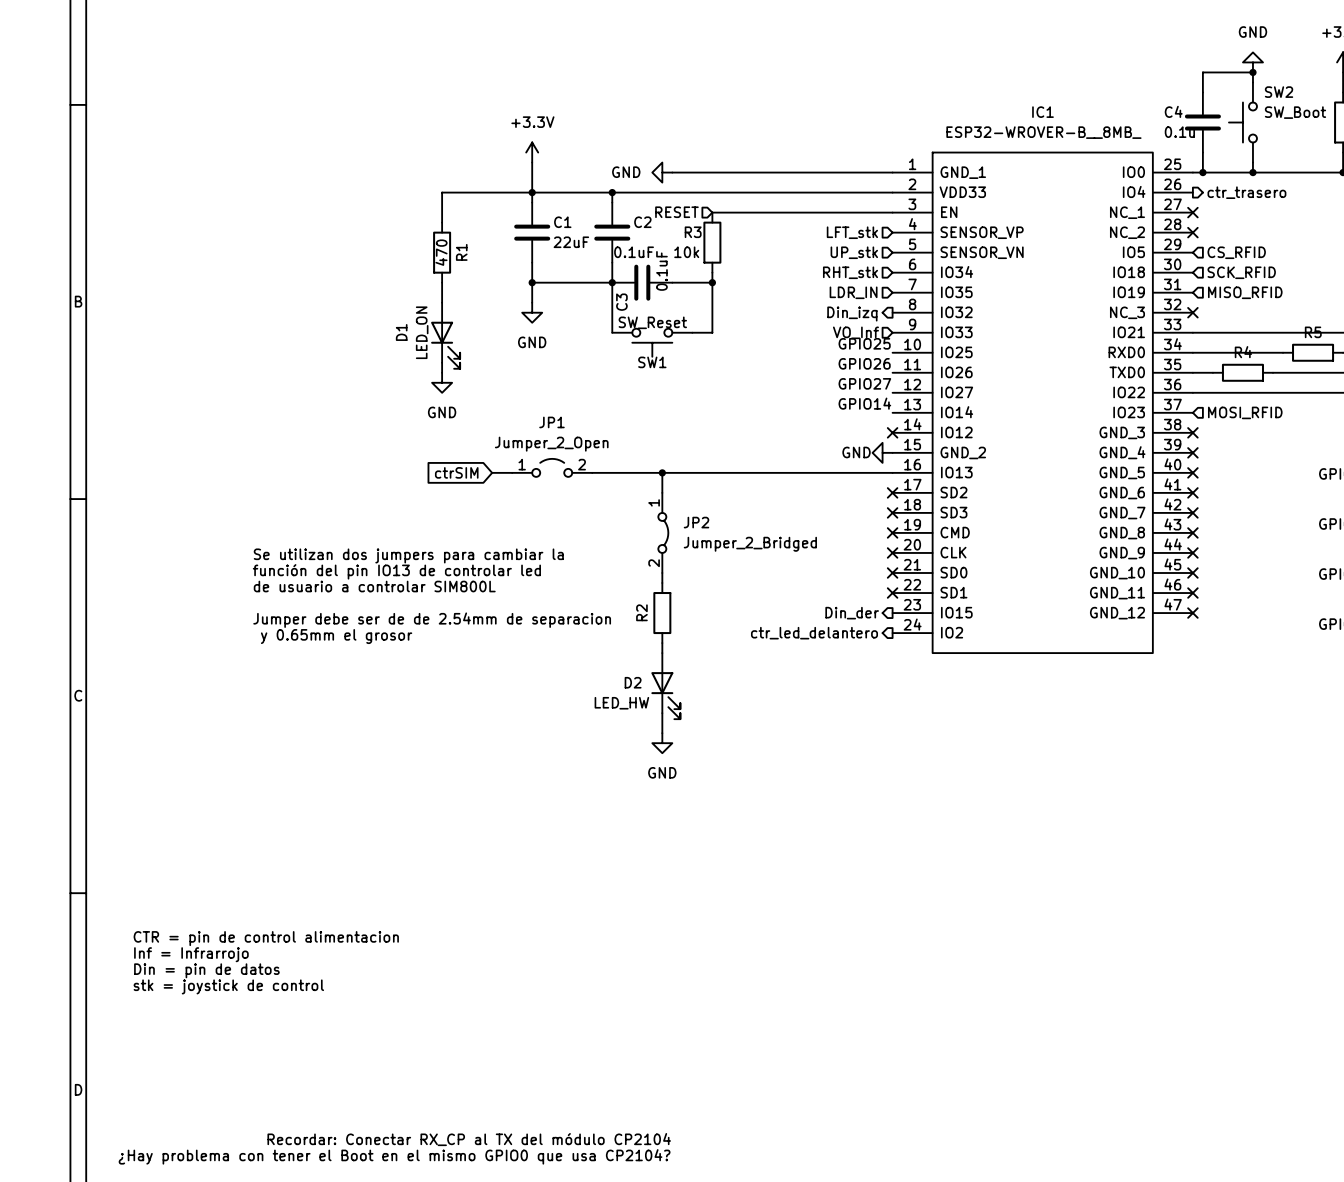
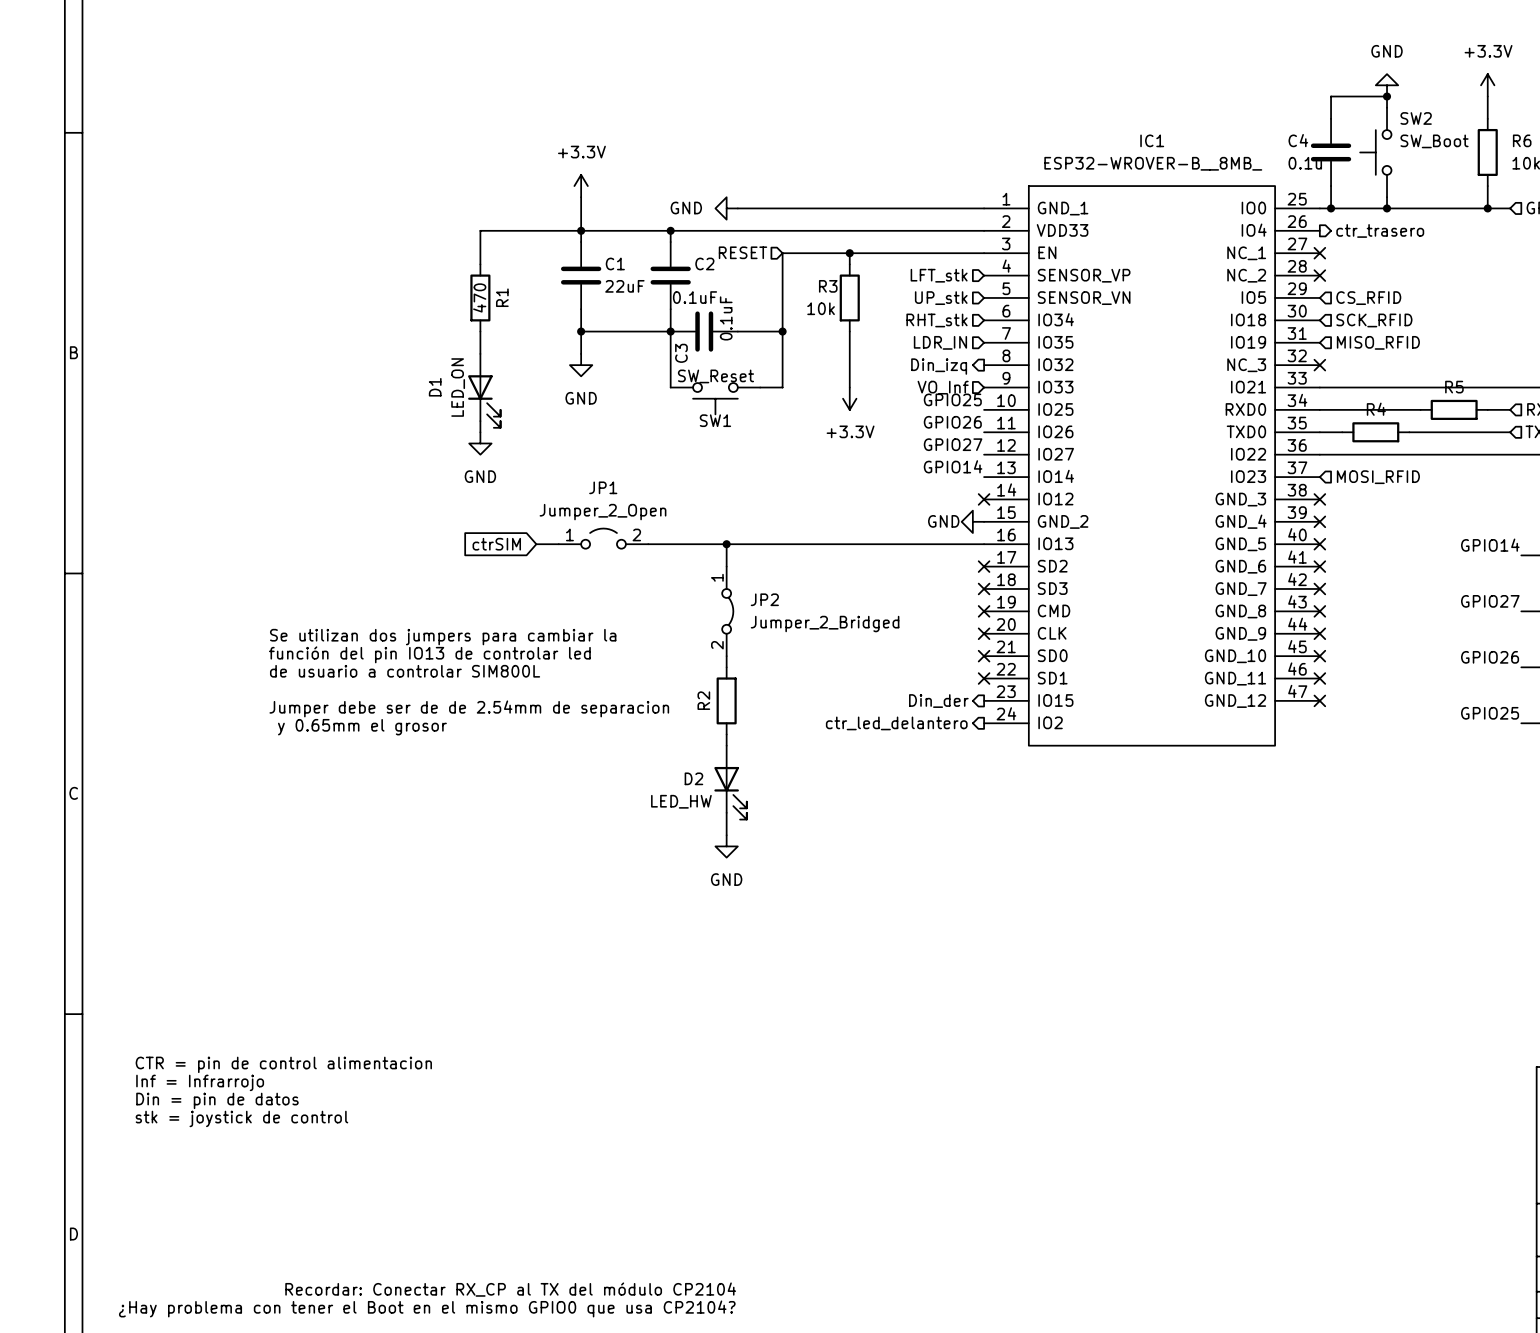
wire: none -> (782, 253) (782, 320)
wire: none -> (849, 253) (849, 264)
junction: none -> (849, 253)
R3 position: (712, 242) -> (849, 297)
wire: none -> (849, 331) (849, 387)
power symbol: none -> +3.3V (849, 398)

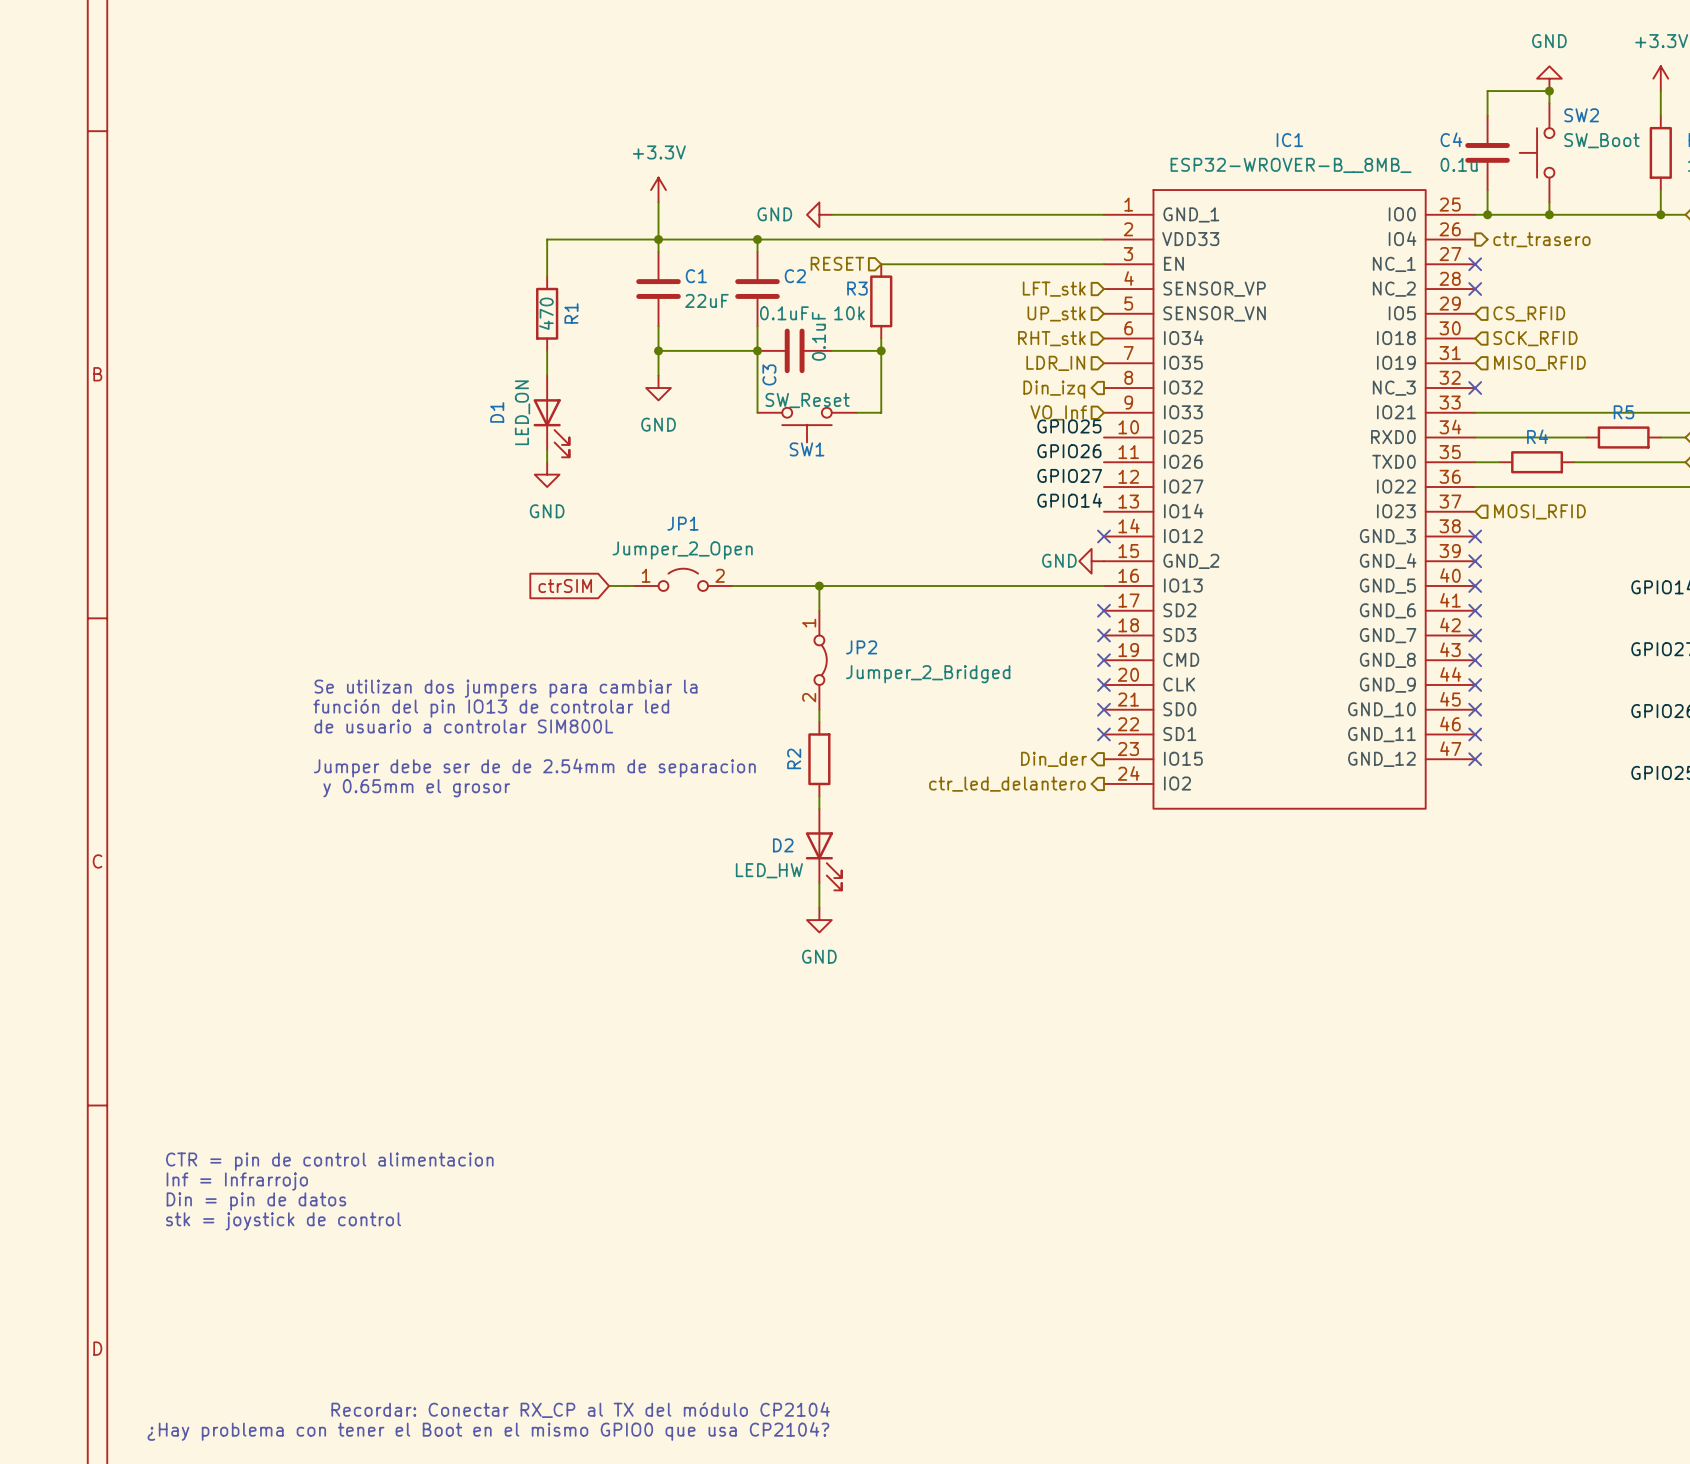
wire: (782, 253) (782, 320) -> none
wire: (849, 253) (849, 264) -> none
junction: (849, 253) -> none
R3 position: (849, 297) -> (881, 301)
wire: (849, 331) (849, 387) -> none
power symbol: +3.3V (849, 398) -> none

